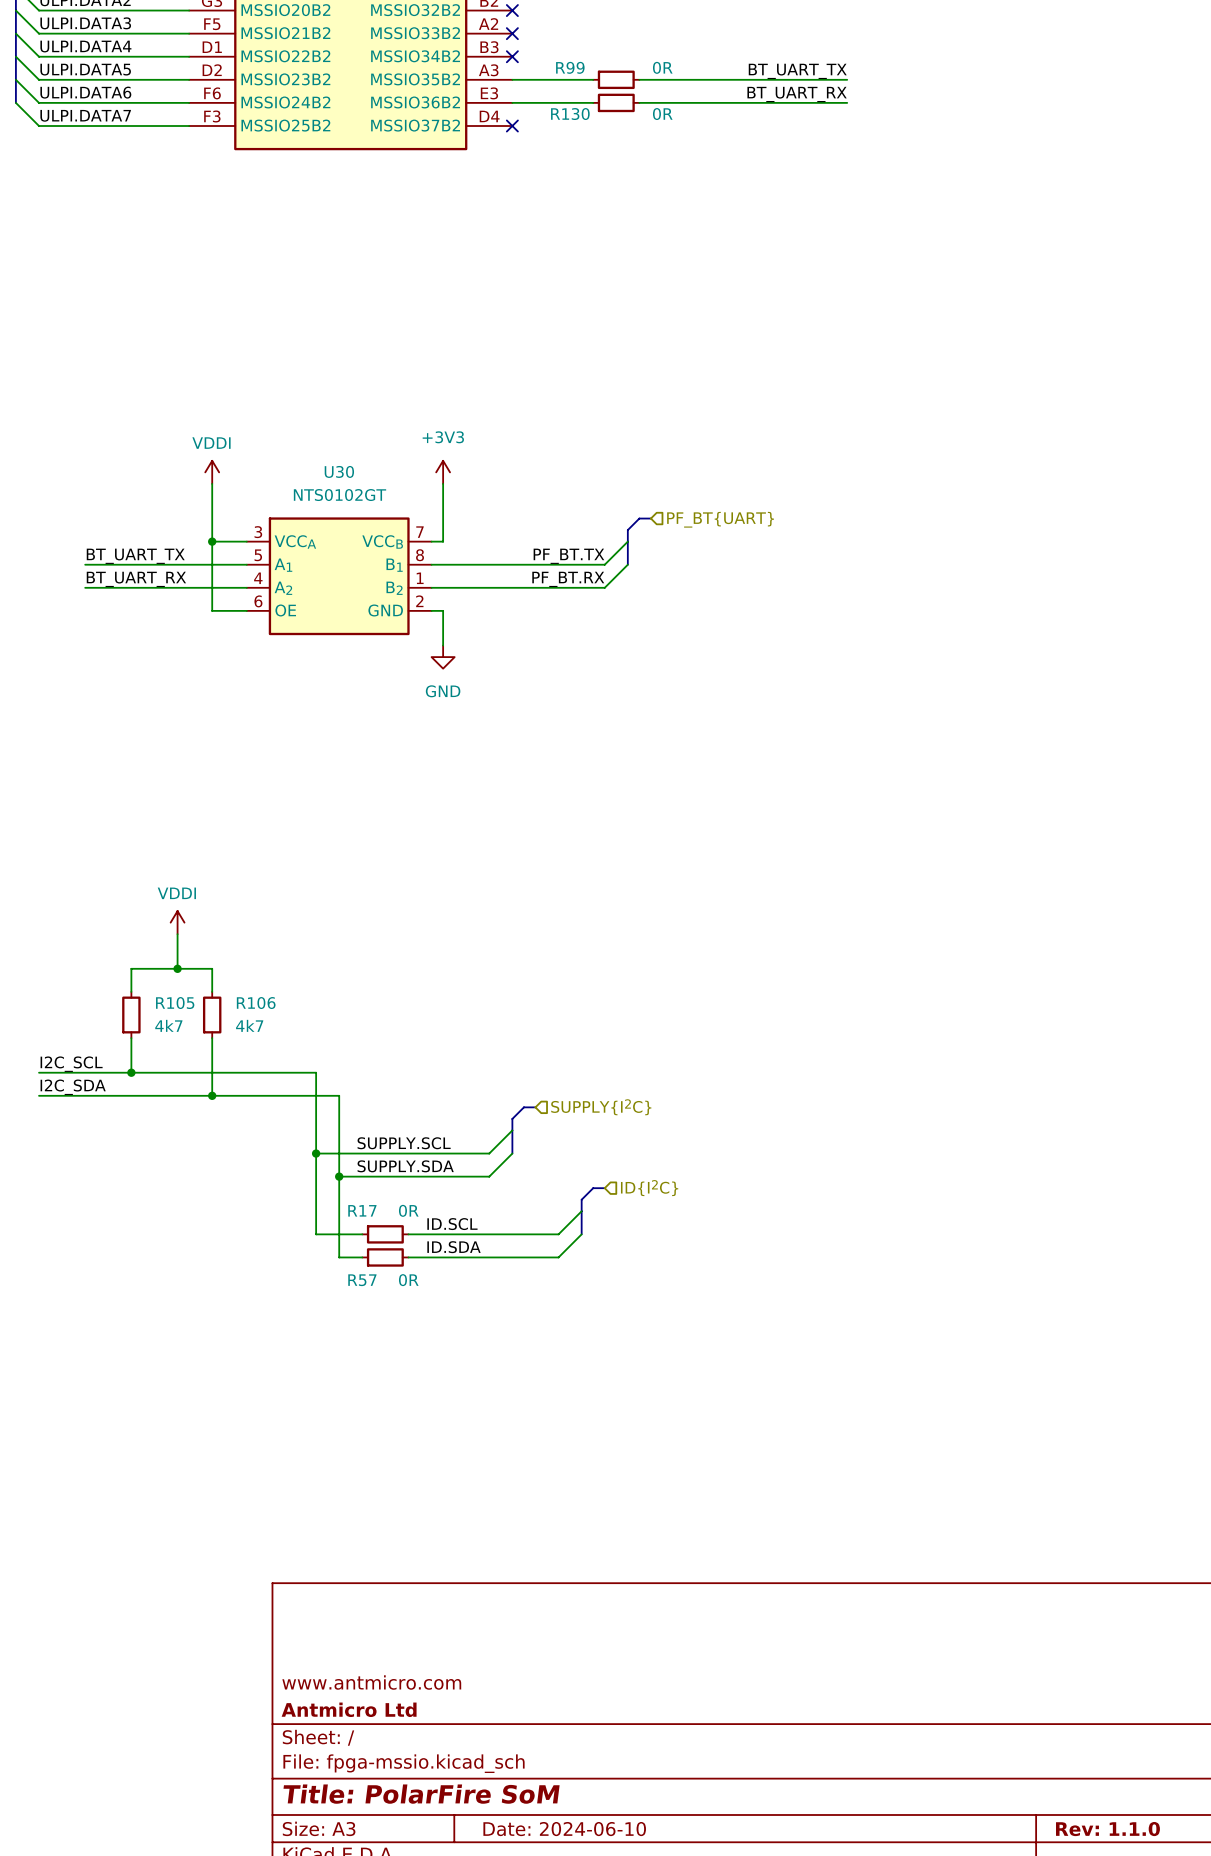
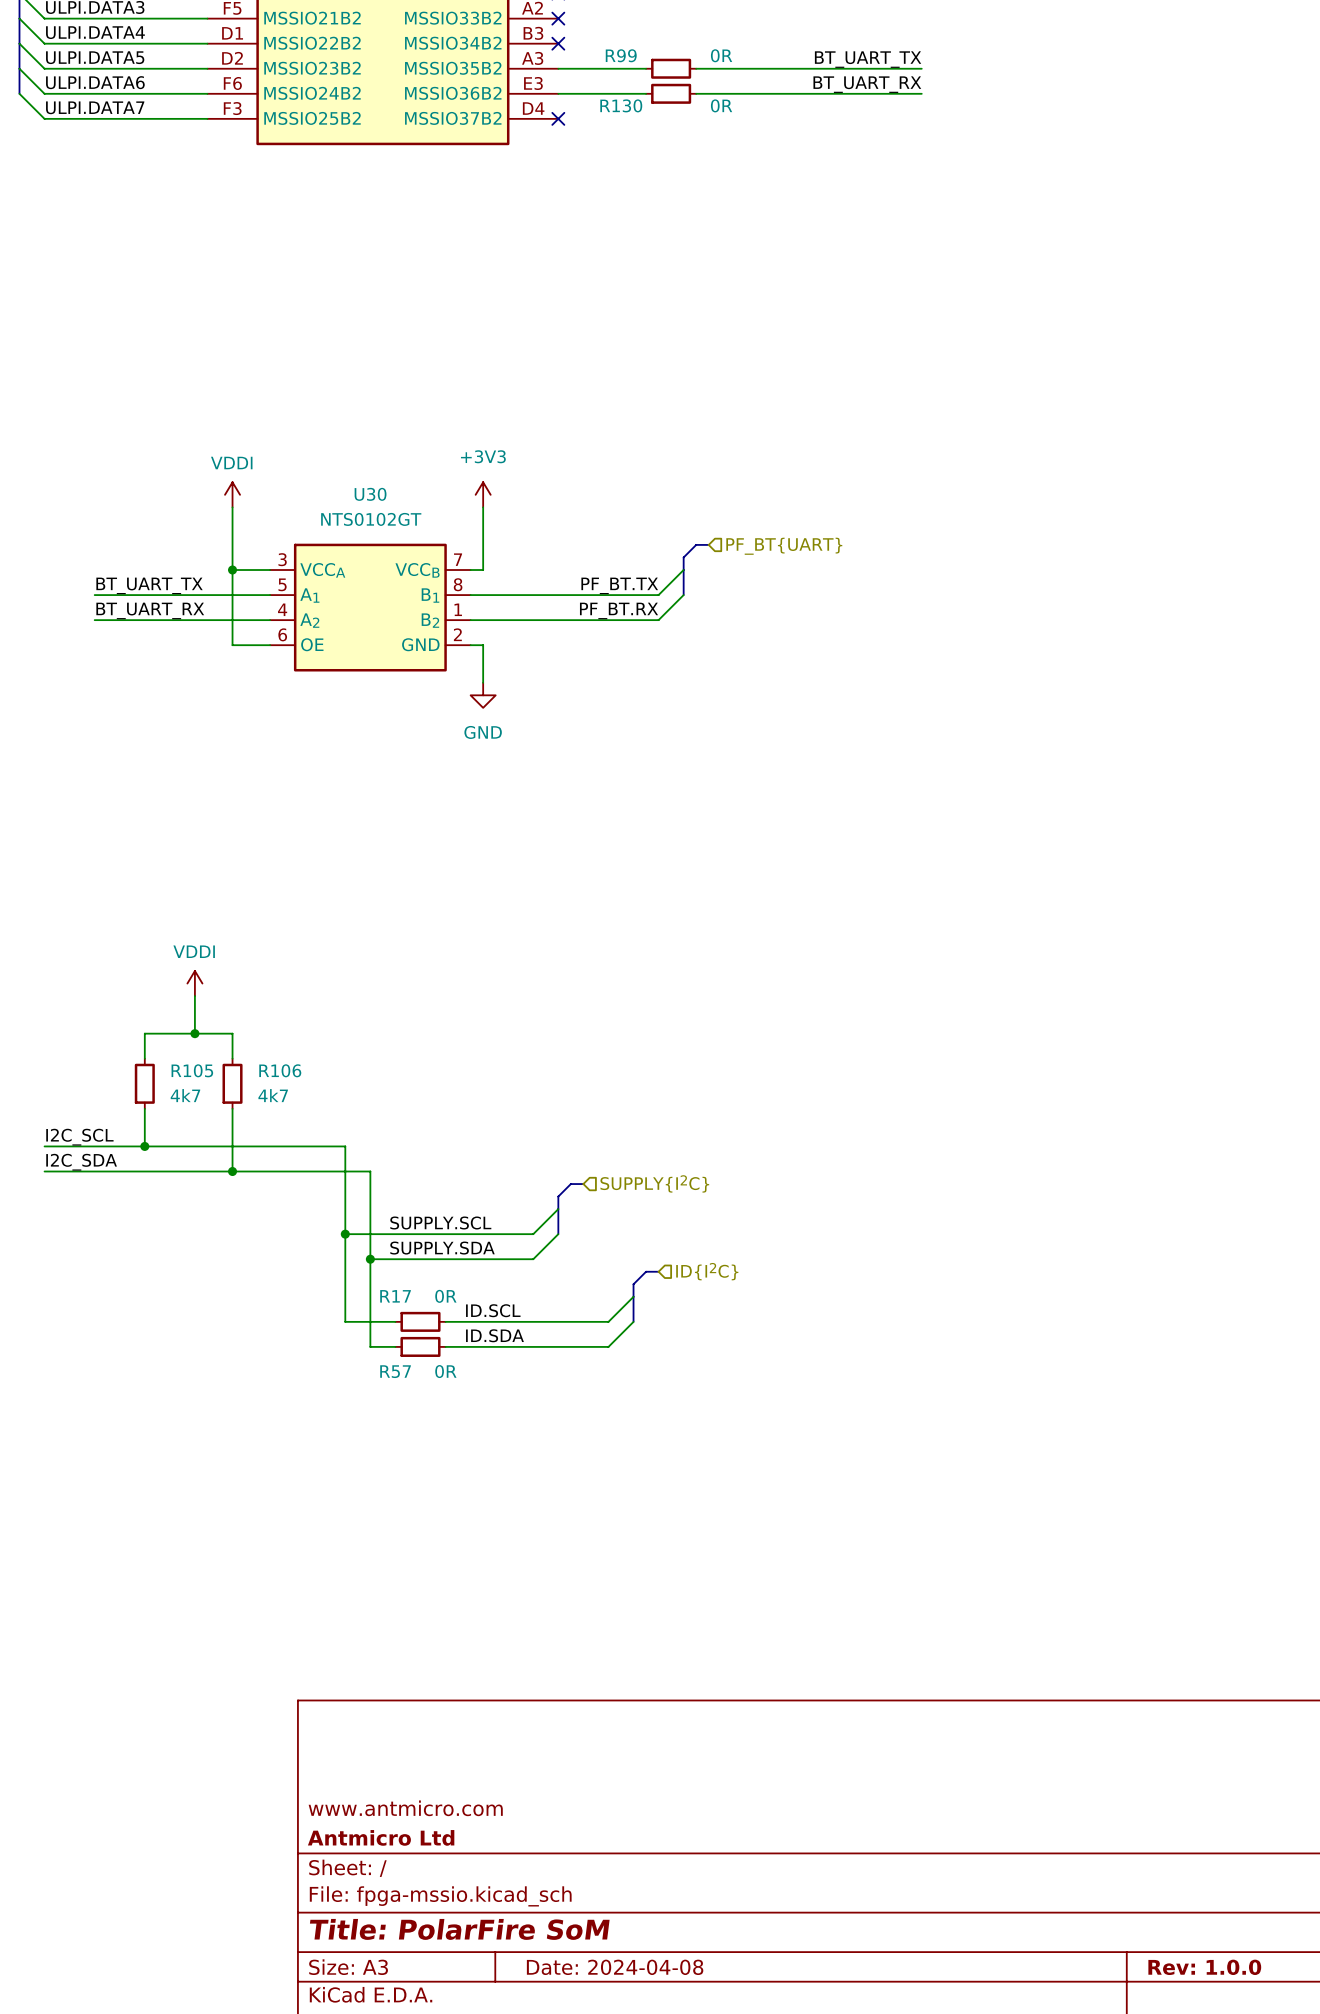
title block: Date: 2024-06-10 (564, 1829) -> Date: 2024-04-08 (615, 1967)
title block: Rev: 1.1.0 (1107, 1829) -> Rev: 1.0.0 (1204, 1967)

